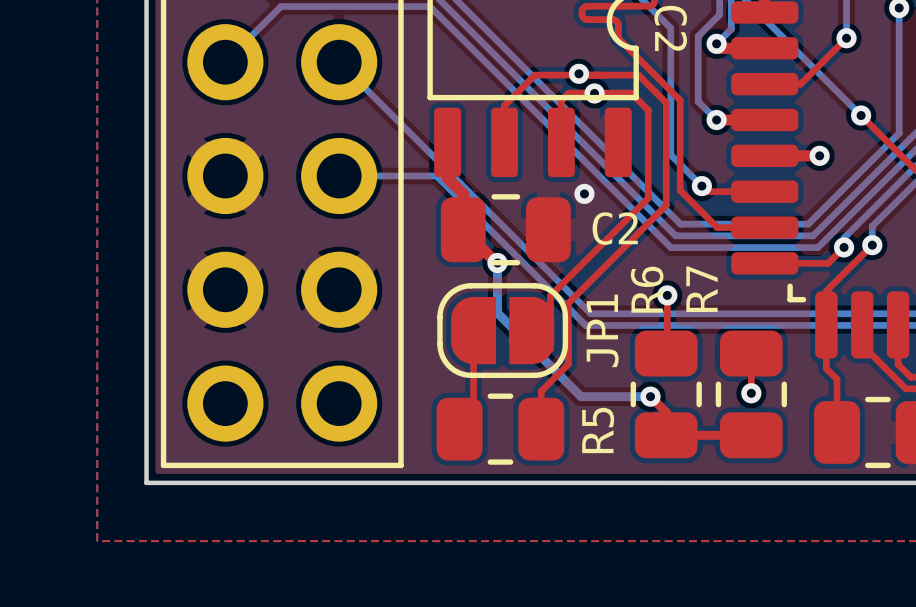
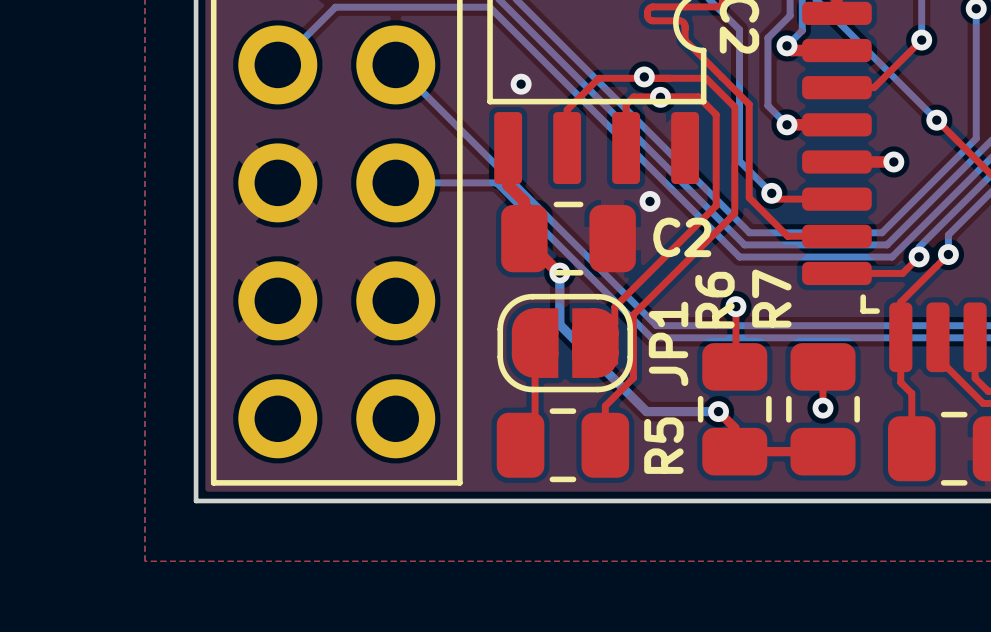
via: none -> (521, 84)

